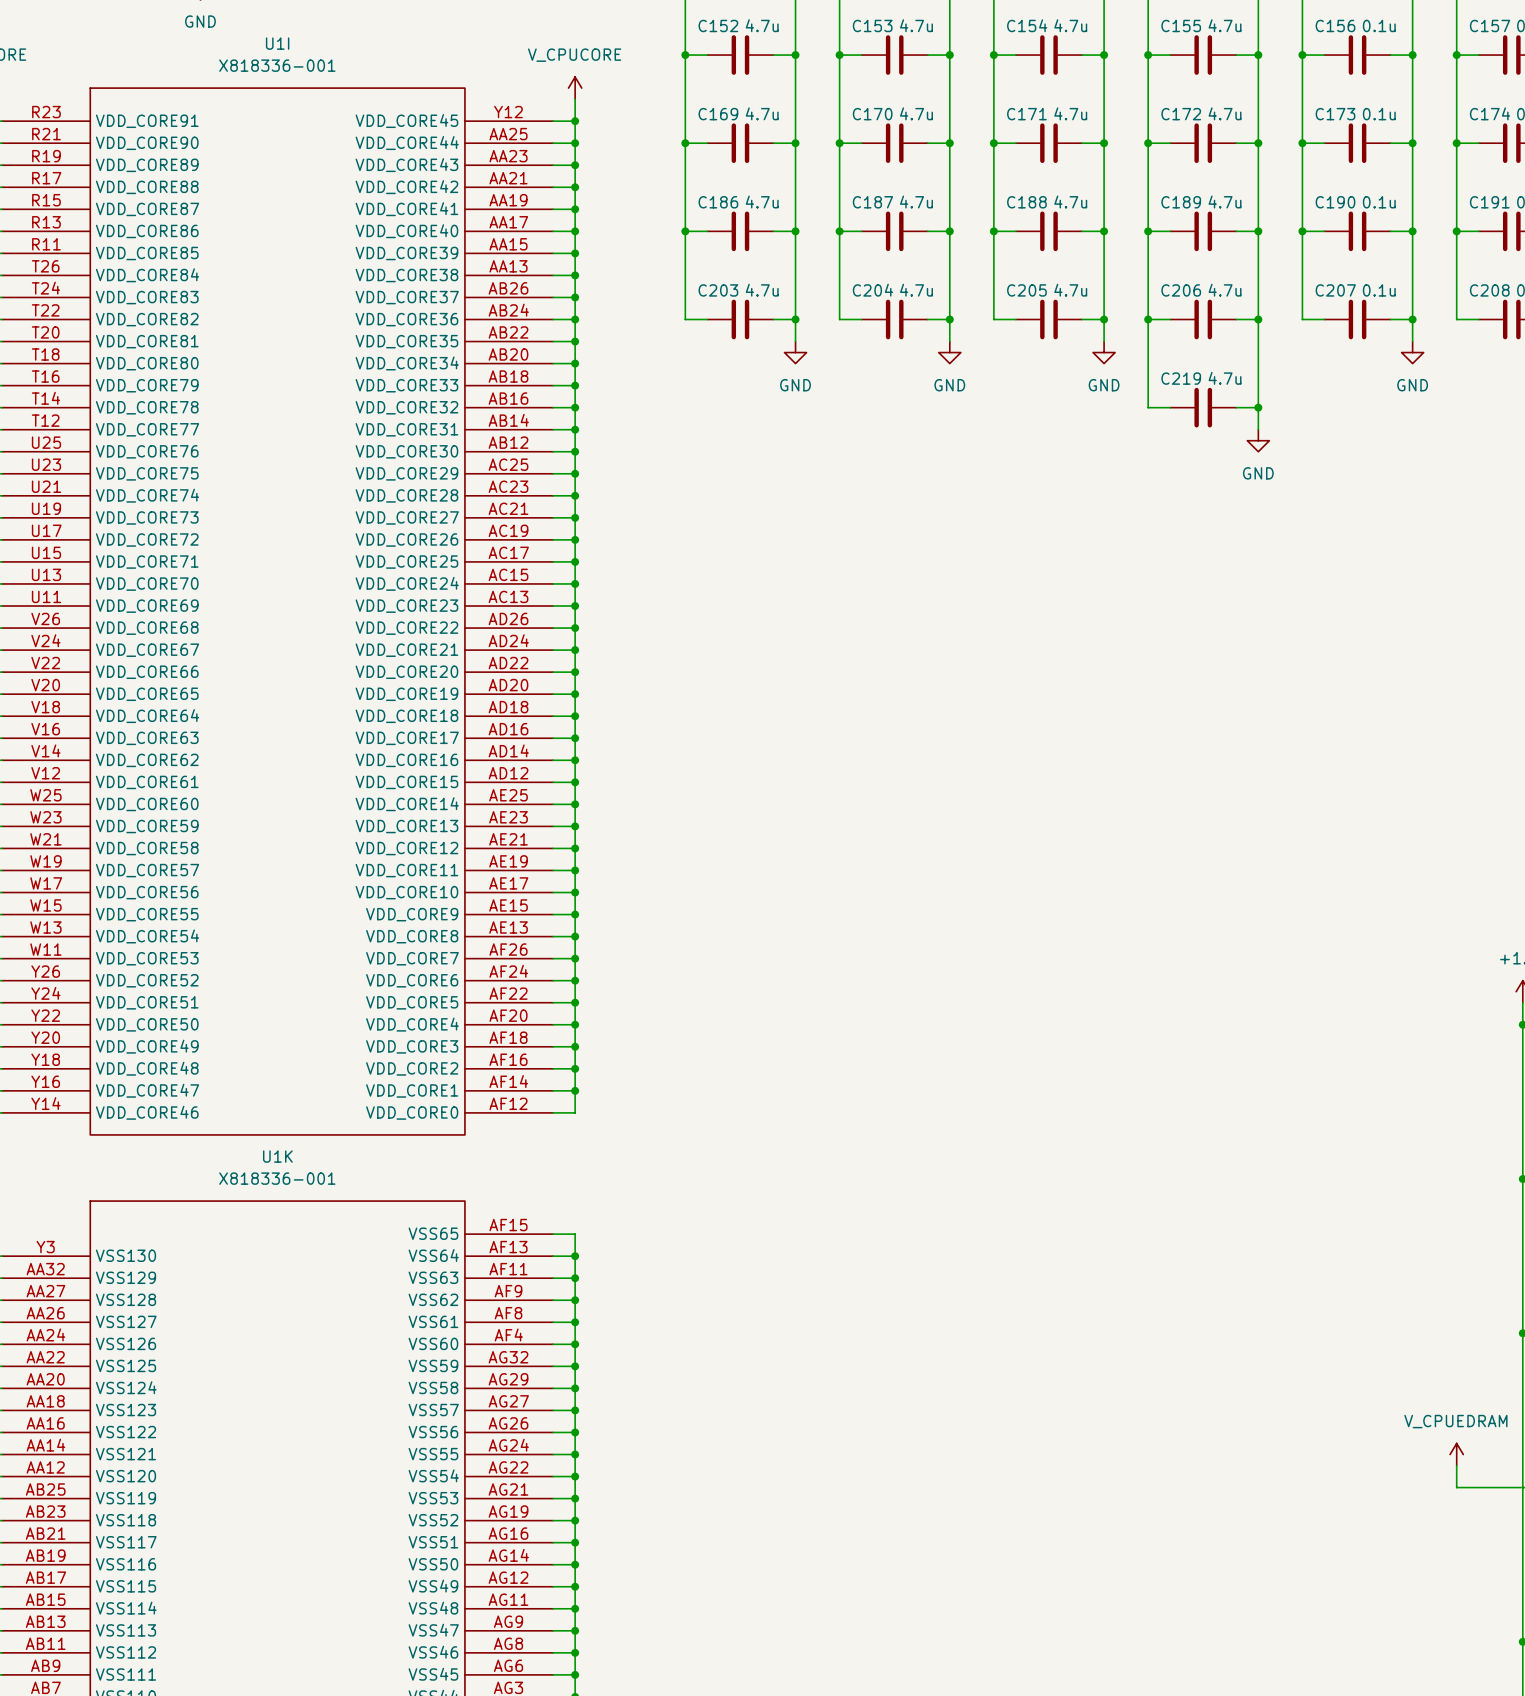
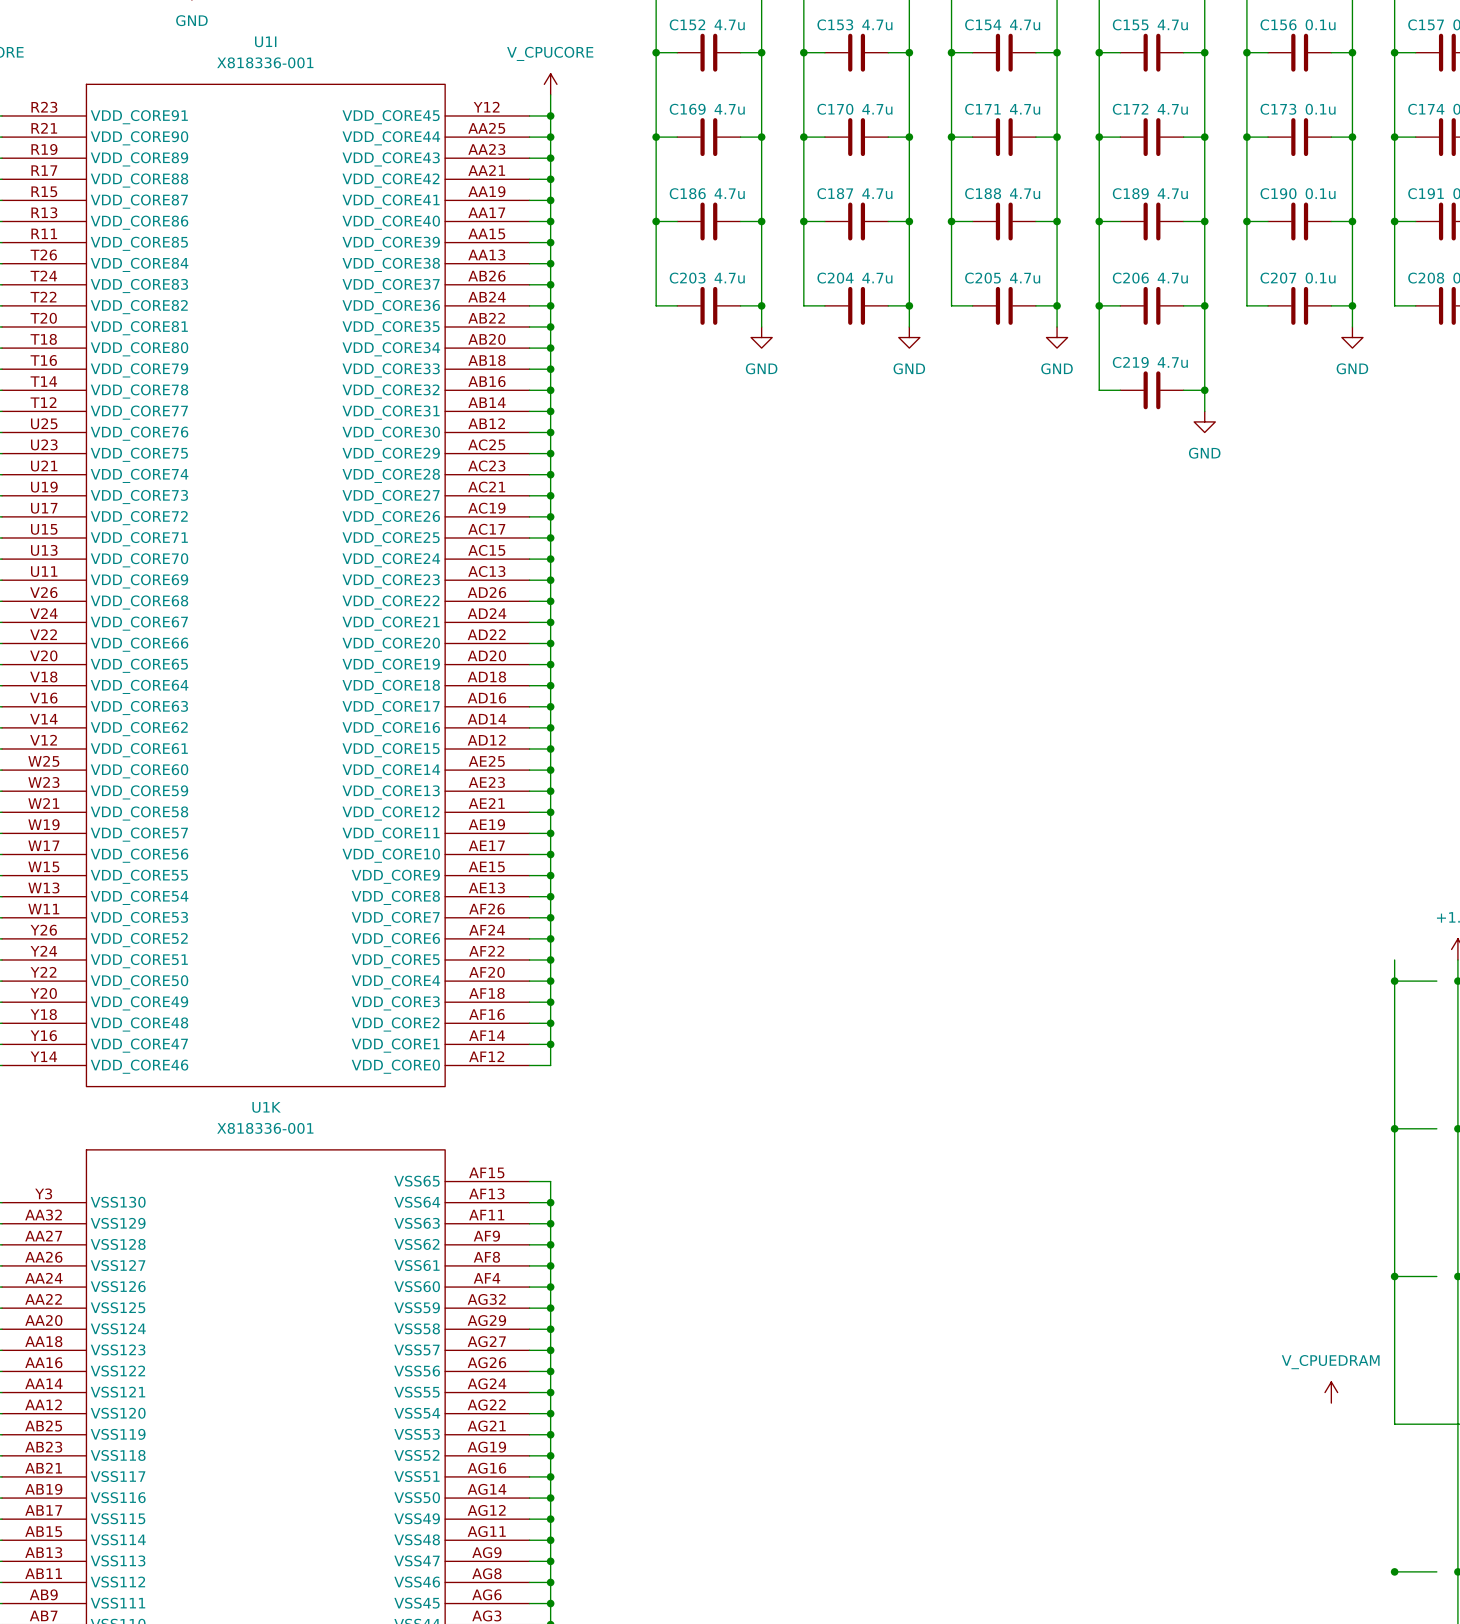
wire: none -> (1394, 959) (1394, 1403)
wire: none -> (1394, 981) (1436, 981)
junction: none -> (1394, 981)
wire: none -> (1394, 1128) (1436, 1128)
junction: none -> (1394, 1128)
wire: none -> (1394, 1276) (1436, 1276)
junction: none -> (1394, 1276)
power symbol position: V_CPUEDRAM (1456, 1454) -> V_CPUEDRAM (1331, 1392)
wire: none -> (1394, 1571) (1436, 1571)
junction: none -> (1394, 1571)

